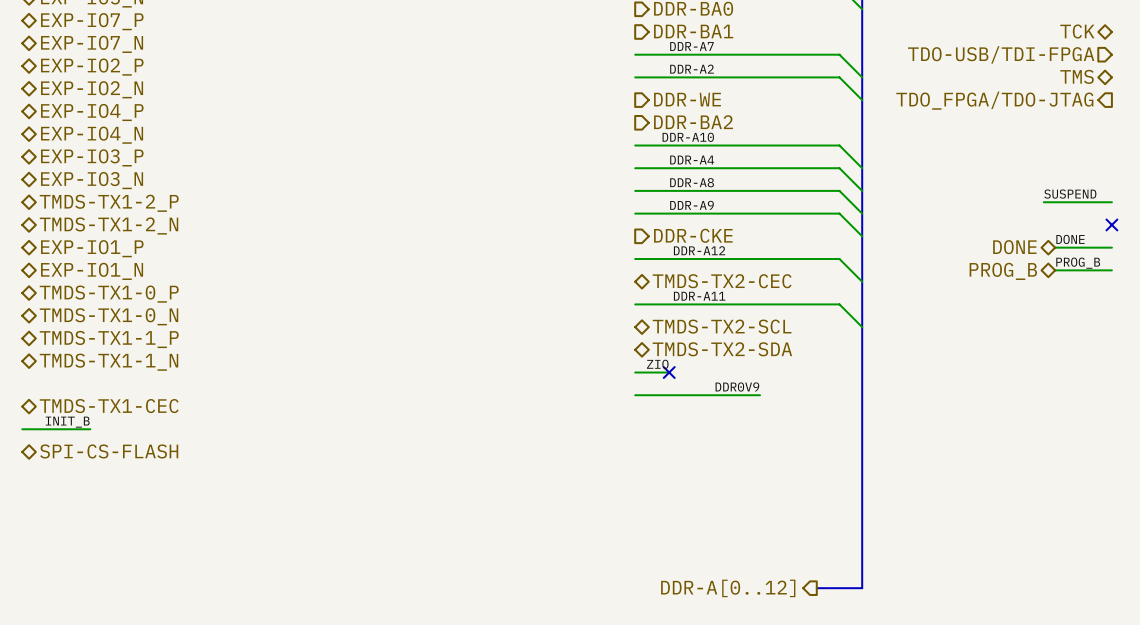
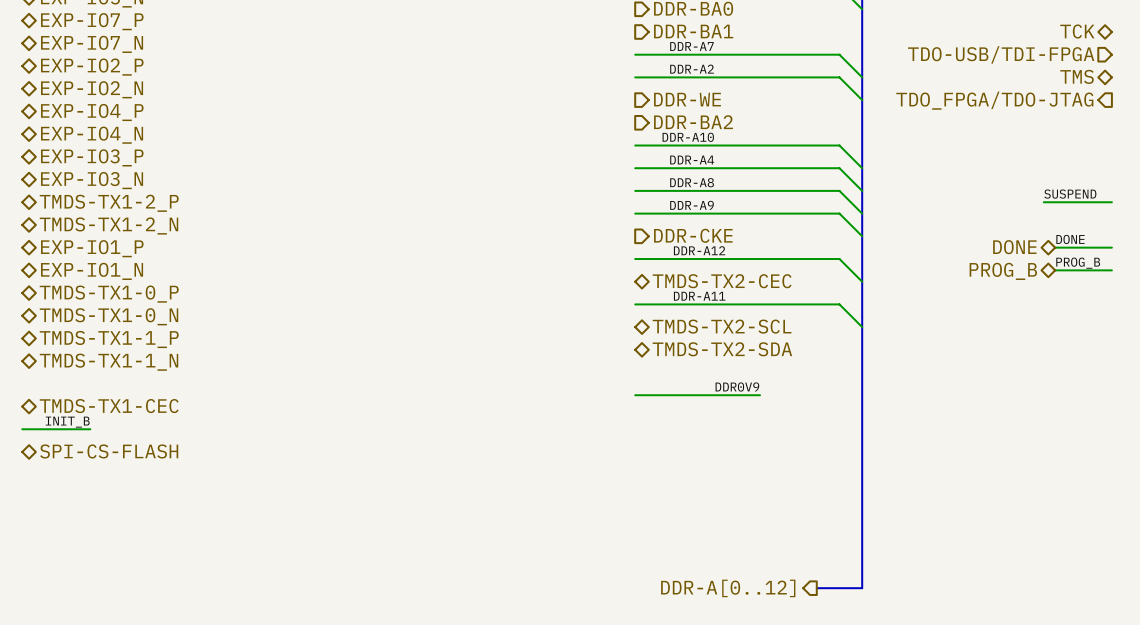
no-connect mark: (1111, 224) -> none
label: ZIO (657, 364) -> none
wire: (635, 372) (669, 372) -> none
no-connect mark: (669, 372) -> none

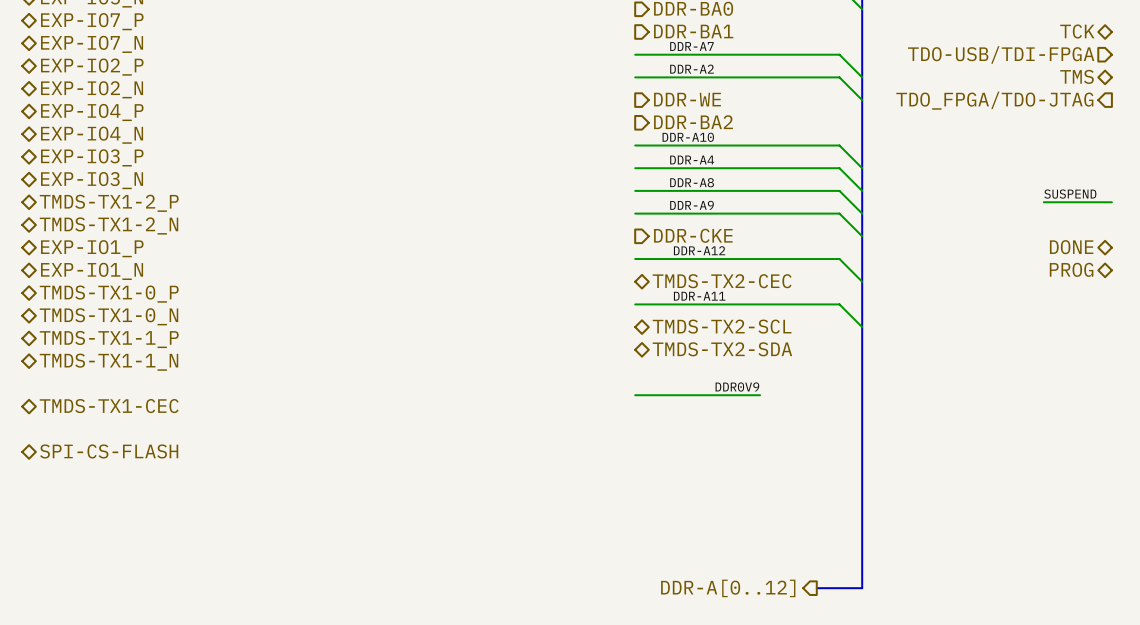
label: DONE (1070, 239) -> none
hierarchical label position: DONE (1014, 247) -> DONE (1071, 247)
wire: (1055, 247) (1111, 247) -> none
label: PROG_B (1078, 263) -> none
wire: (1055, 270) (1111, 270) -> none
hierarchical label: PROG_B (1003, 271) -> PROG (1071, 269)
label: INIT_B (67, 422) -> none
wire: (22, 429) (90, 429) -> none

